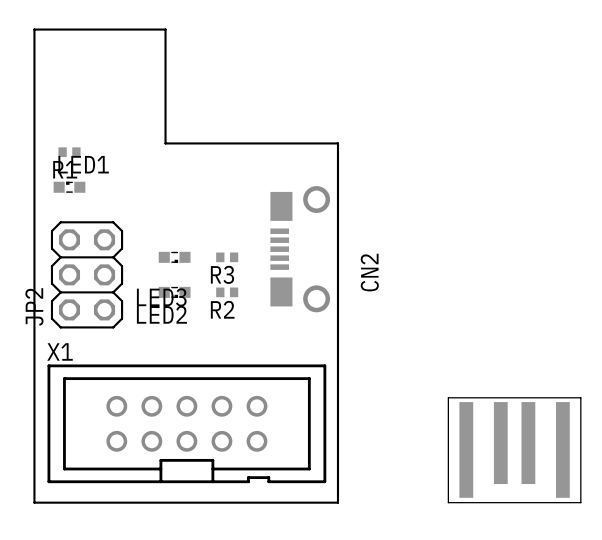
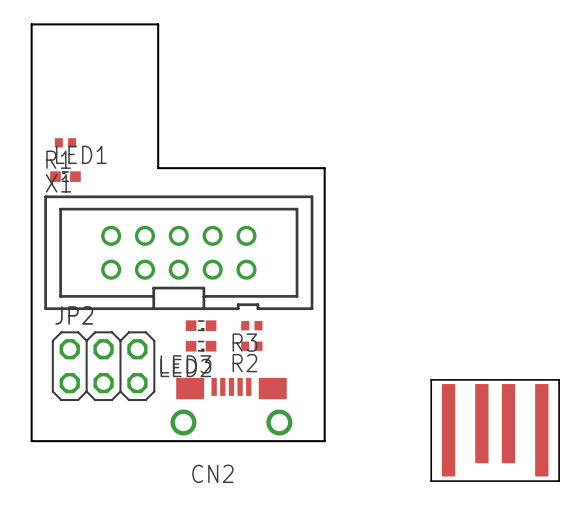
board edge: (165, 143) (337, 143) (337, 178) -> (158, 134) (158, 168) (324, 168)
CN2 rotation: 0° (300, 249) -> 90° clockwise (231, 406)
CN2 position: (300, 249) -> (231, 406)
LED3 position: (174, 257) -> (201, 325)
R3 position: (227, 257) -> (251, 325)
JP2 rotation: 0° (87, 274) -> 90° clockwise (103, 366)
JP2 position: (87, 274) -> (103, 366)
LED2 position: (174, 292) -> (201, 346)
R2 position: (227, 292) -> (251, 346)
X1 position: (186, 423) -> (178, 252)
board edge: (34, 461) (34, 502) (337, 502) (337, 461) -> (31, 441) (324, 441)

